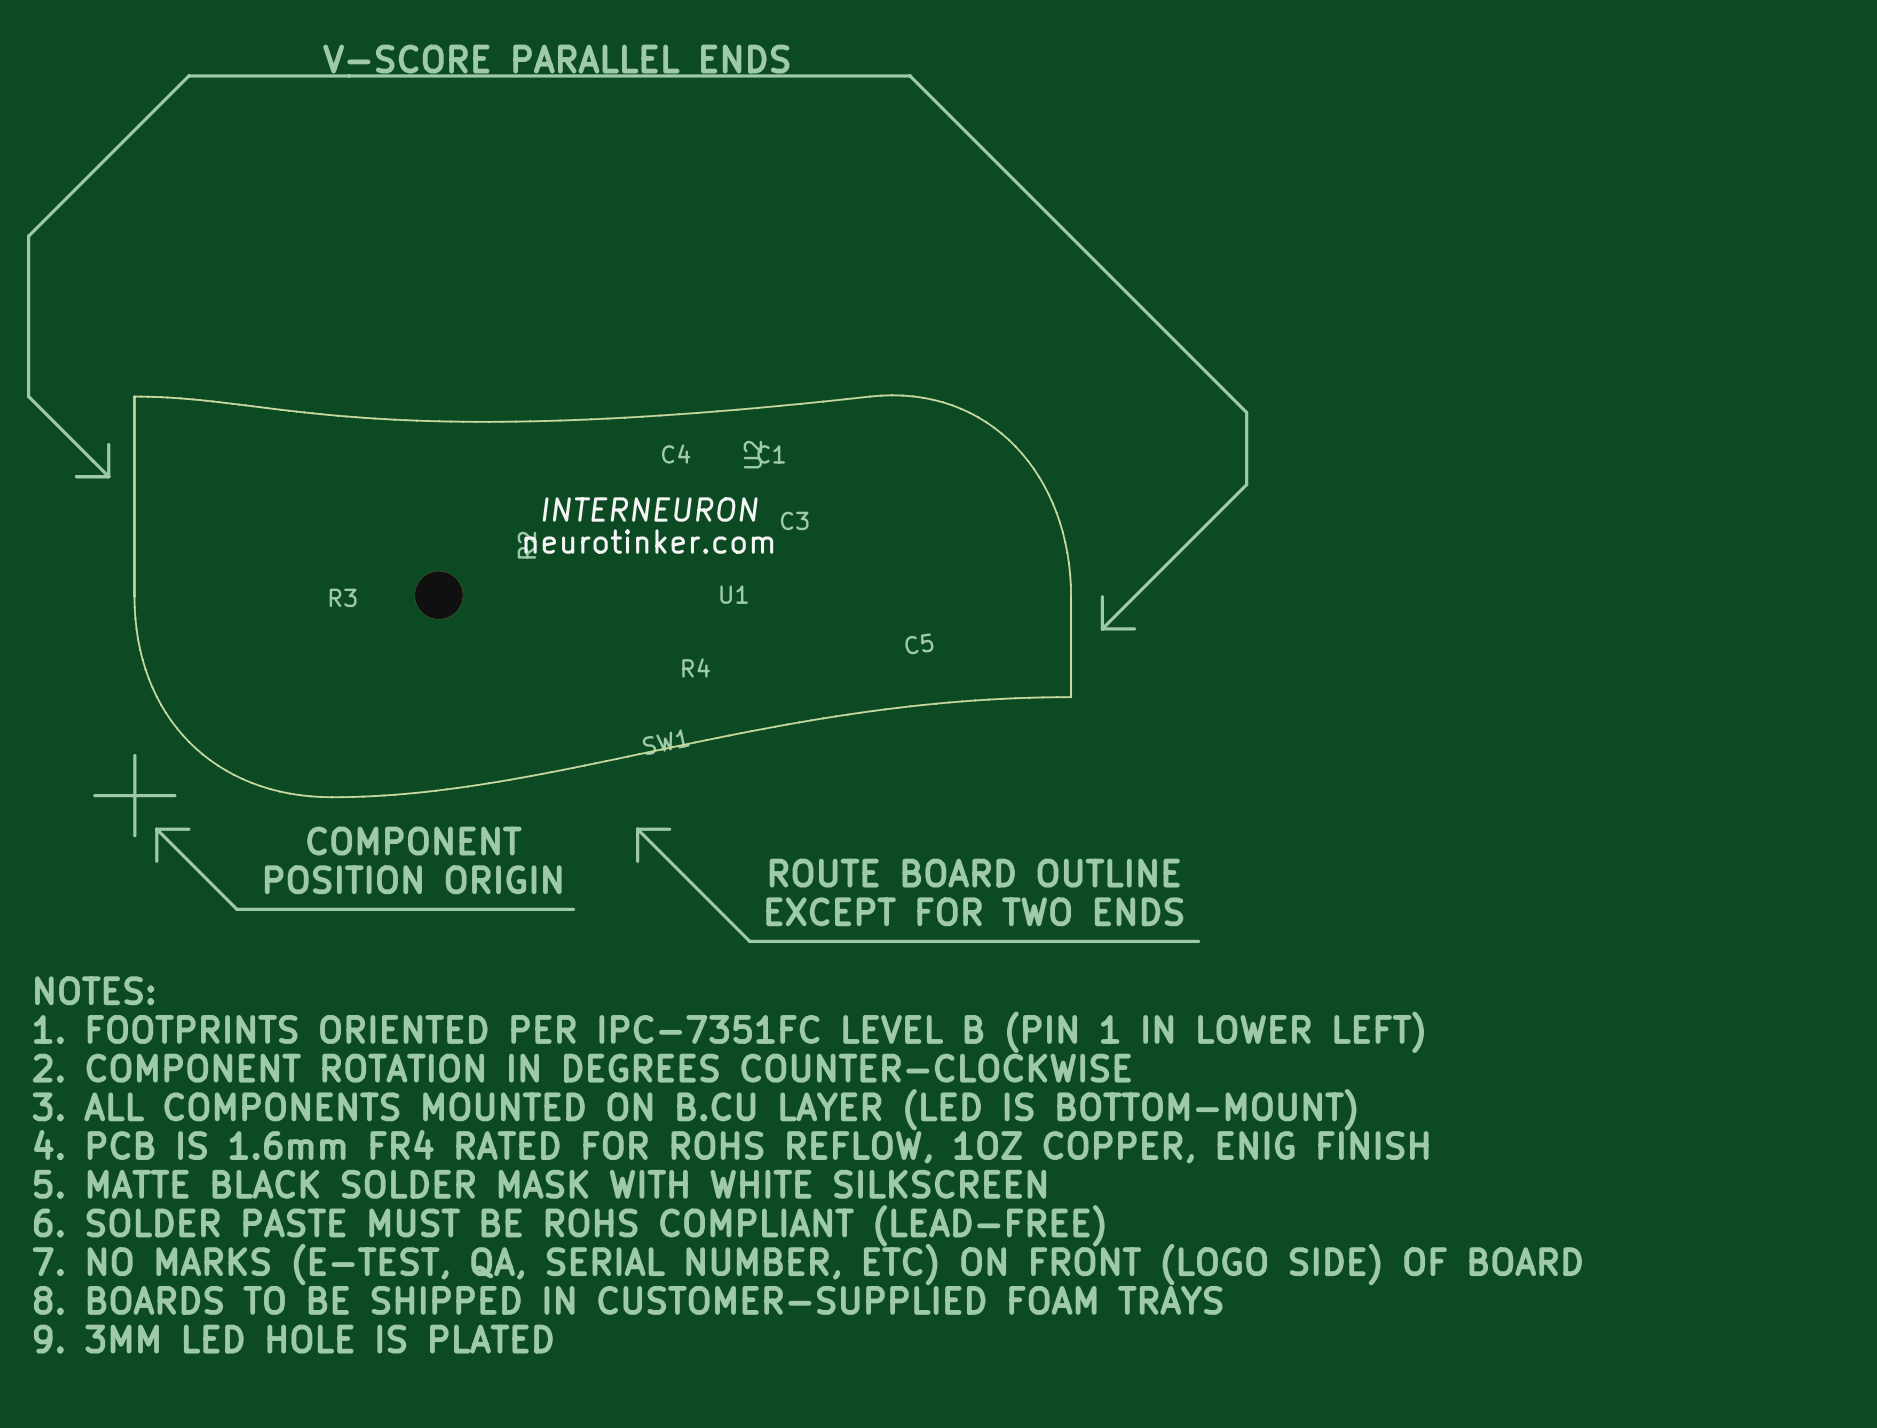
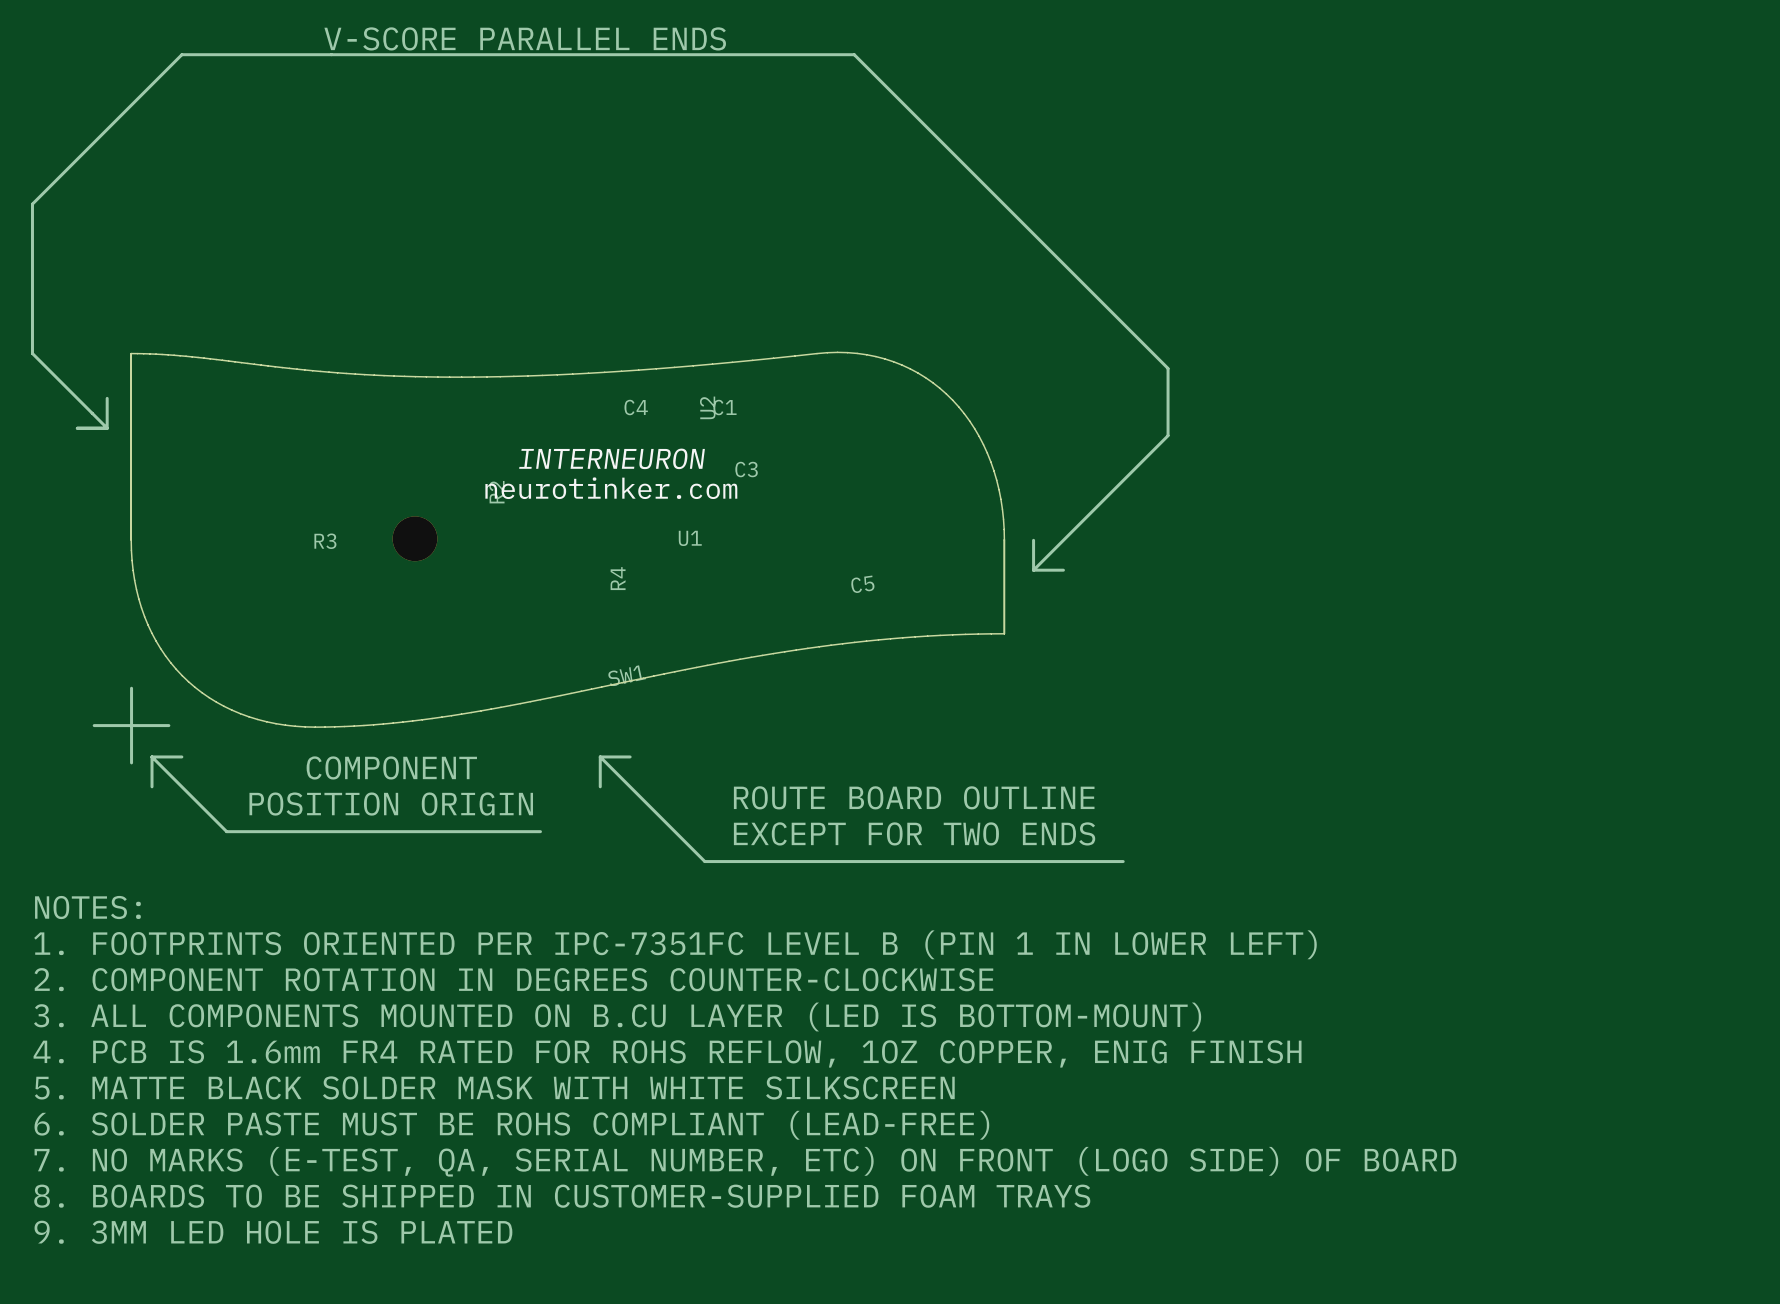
R4 position: (696, 667) -> (618, 578)
R4 name rotation: 0° (696, 667) -> 90° counterclockwise (618, 578)

